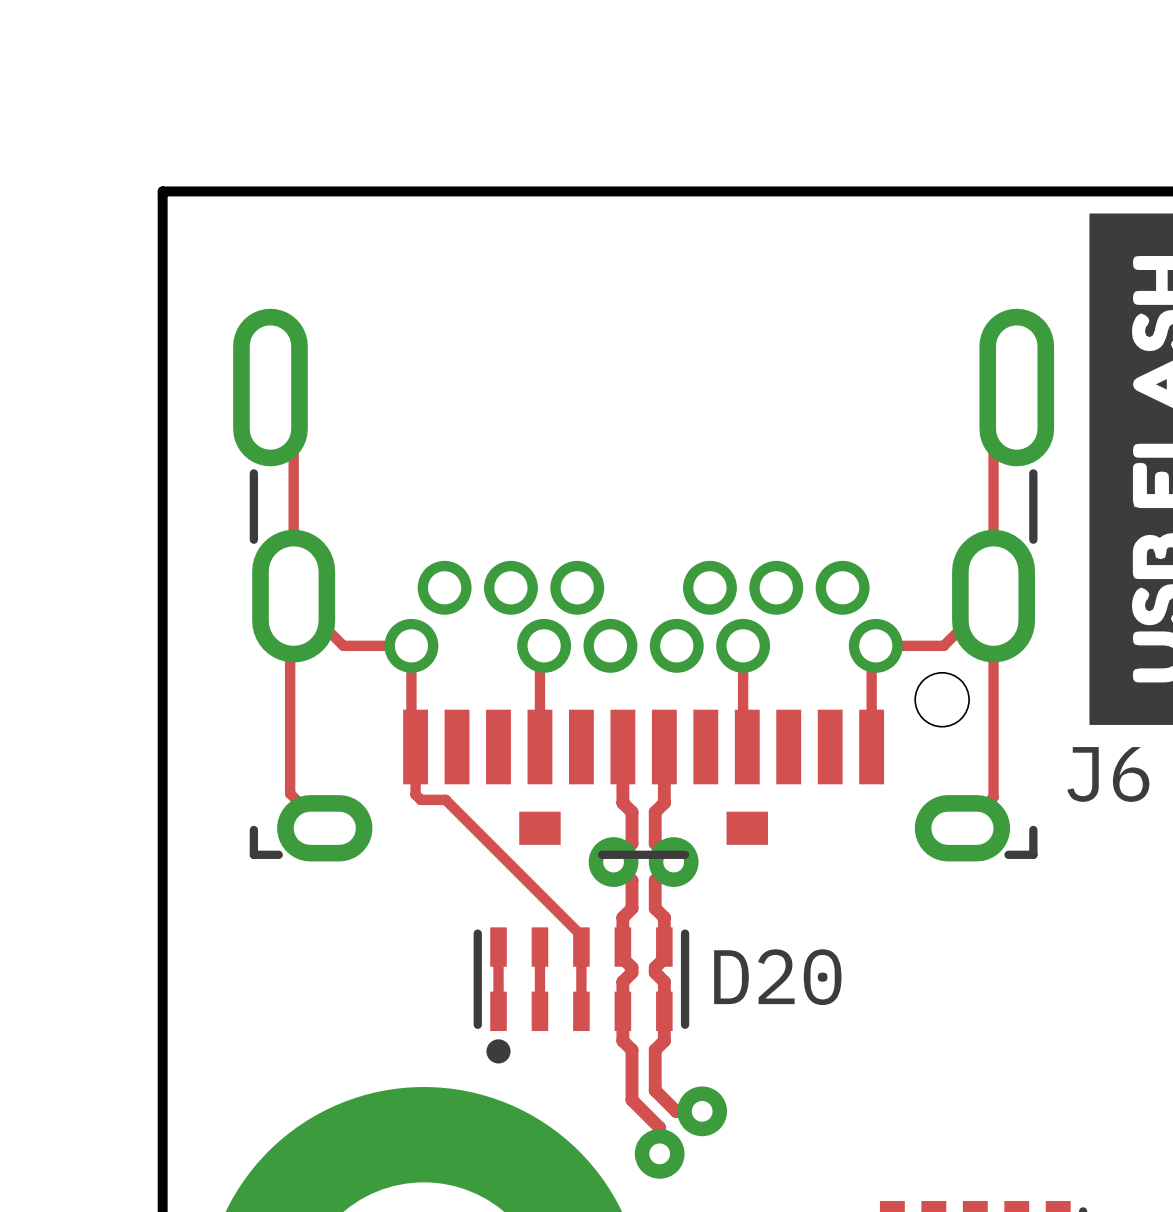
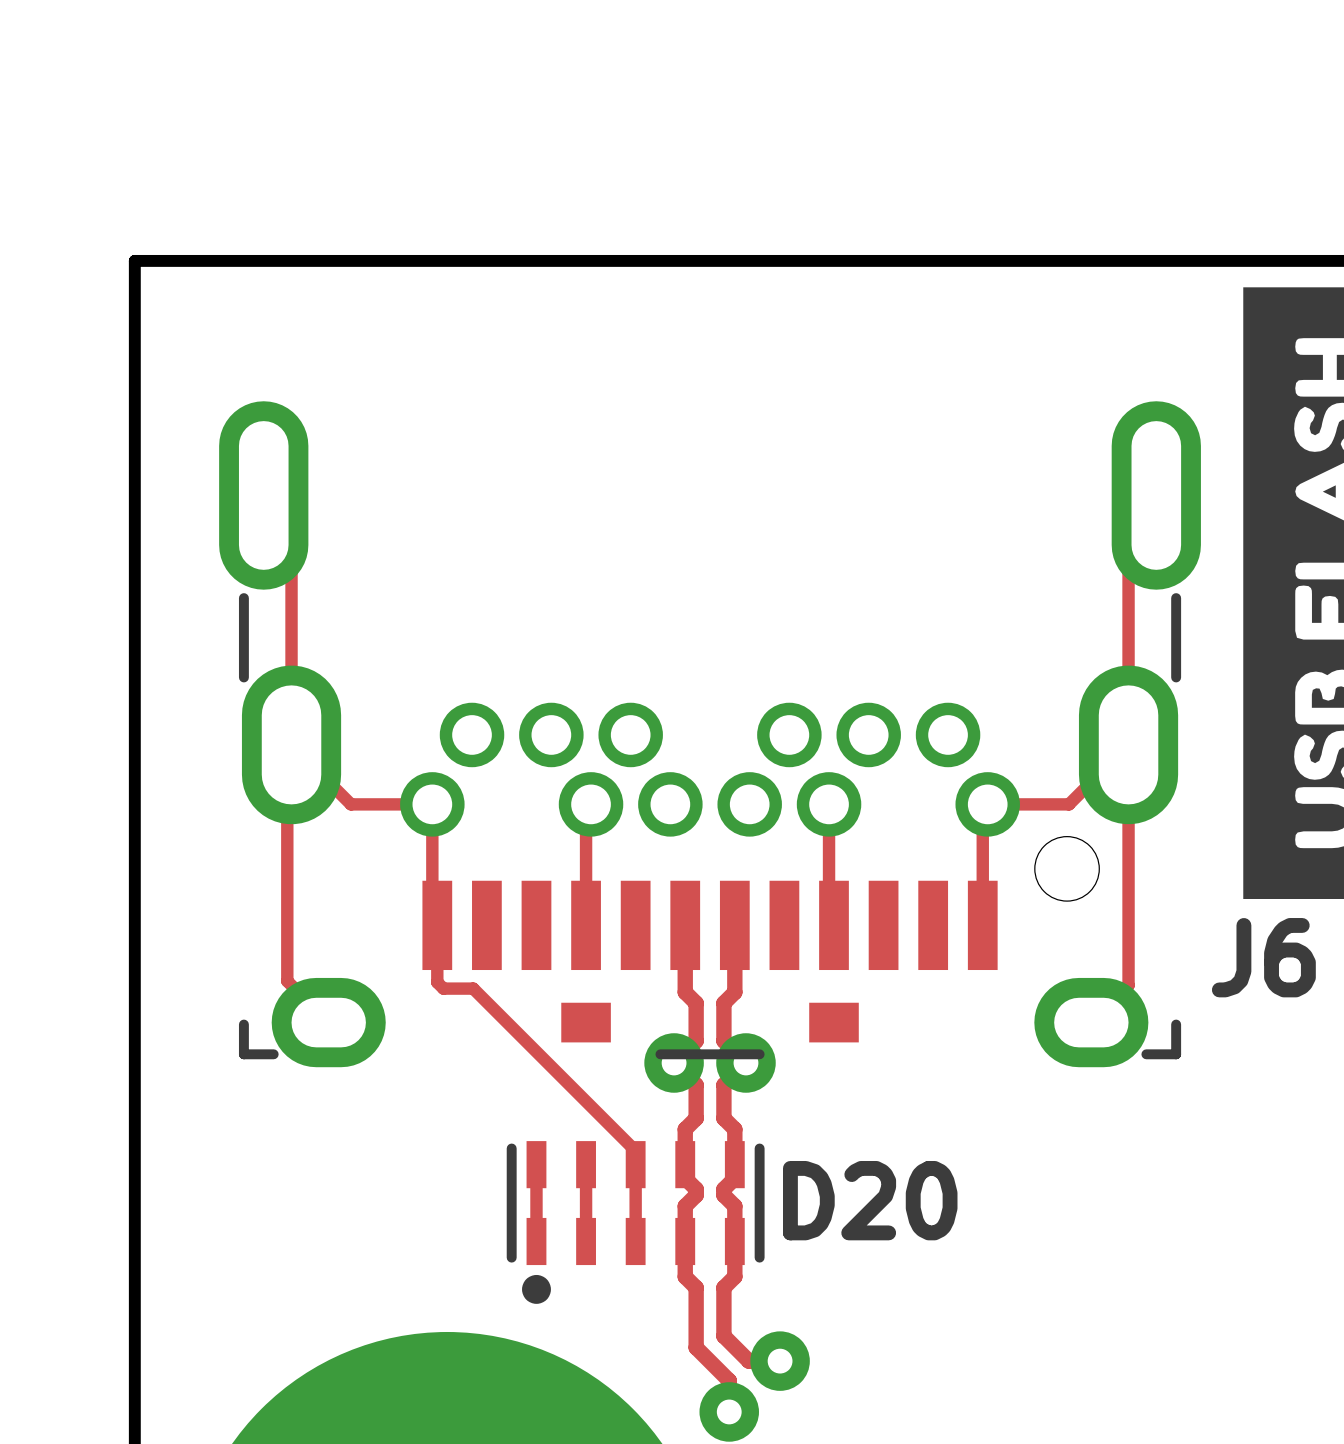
J6 footprint: [233, 308, 1055, 862] -> [219, 401, 1201, 1068]

